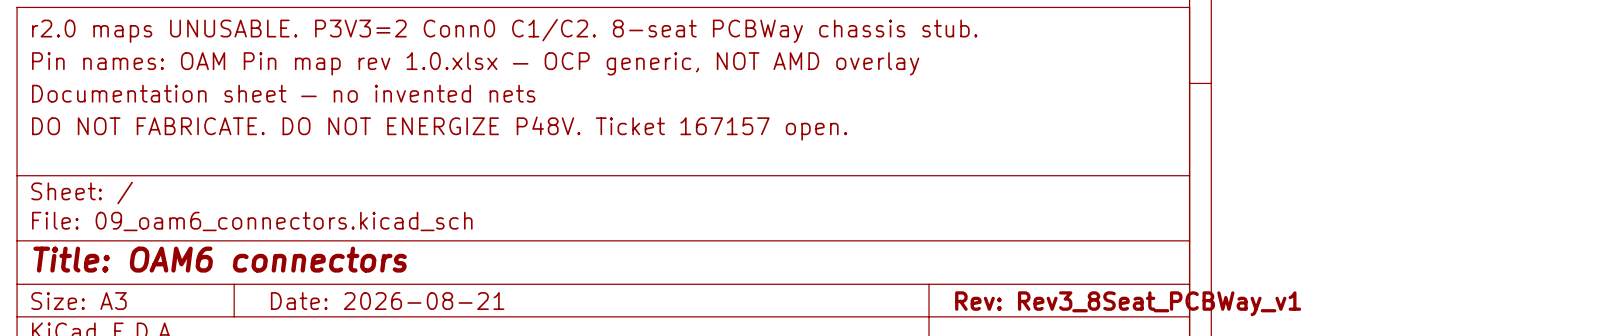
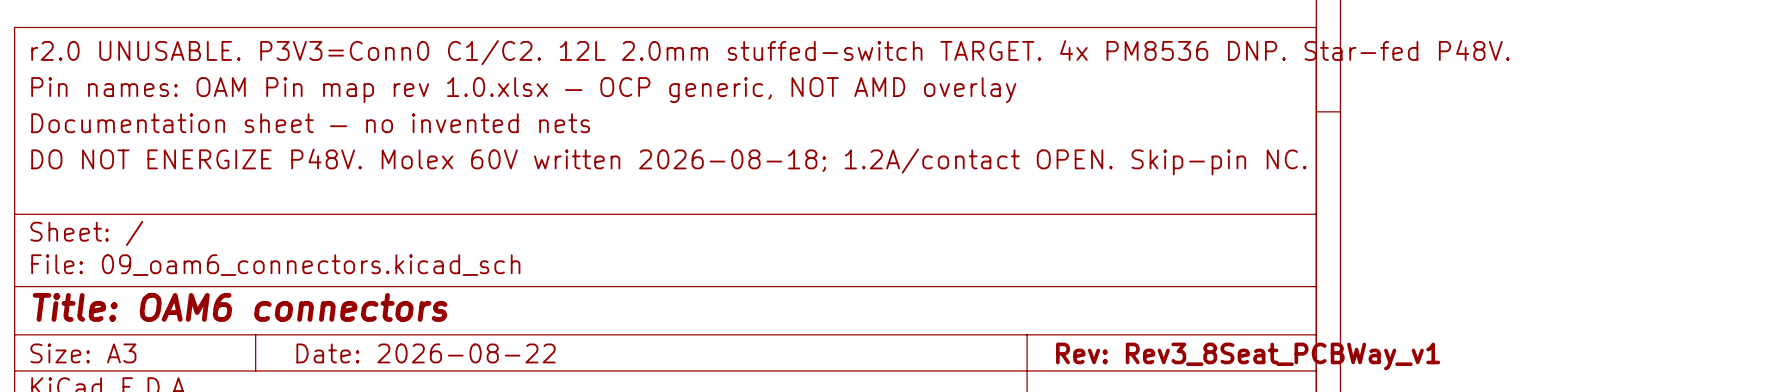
title block: r2.0 maps UNUSABLE. P3V3=2 Conn0 C1/C2. 8-seat PCBWay chassis stub. (504, 30) -> r2.0 UNUSABLE. P3V3=Conn0 C1/C2. 12L 2.0mm stuffed-switch TARGET. 4x PM8536 DNP. Star-fed P48V. (770, 52)
title block: DO NOT FABRICATE. DO NOT ENERGIZE P48V. Ticket 167157 open. (439, 128) -> DO NOT ENERGIZE P48V. Molex 60V written 2026-08-18; 1.2A/contact OPEN. Skip-pin NC. (668, 161)
title block: Date: 2026-08-21 (387, 301) -> Date: 2026-08-22 (426, 353)

